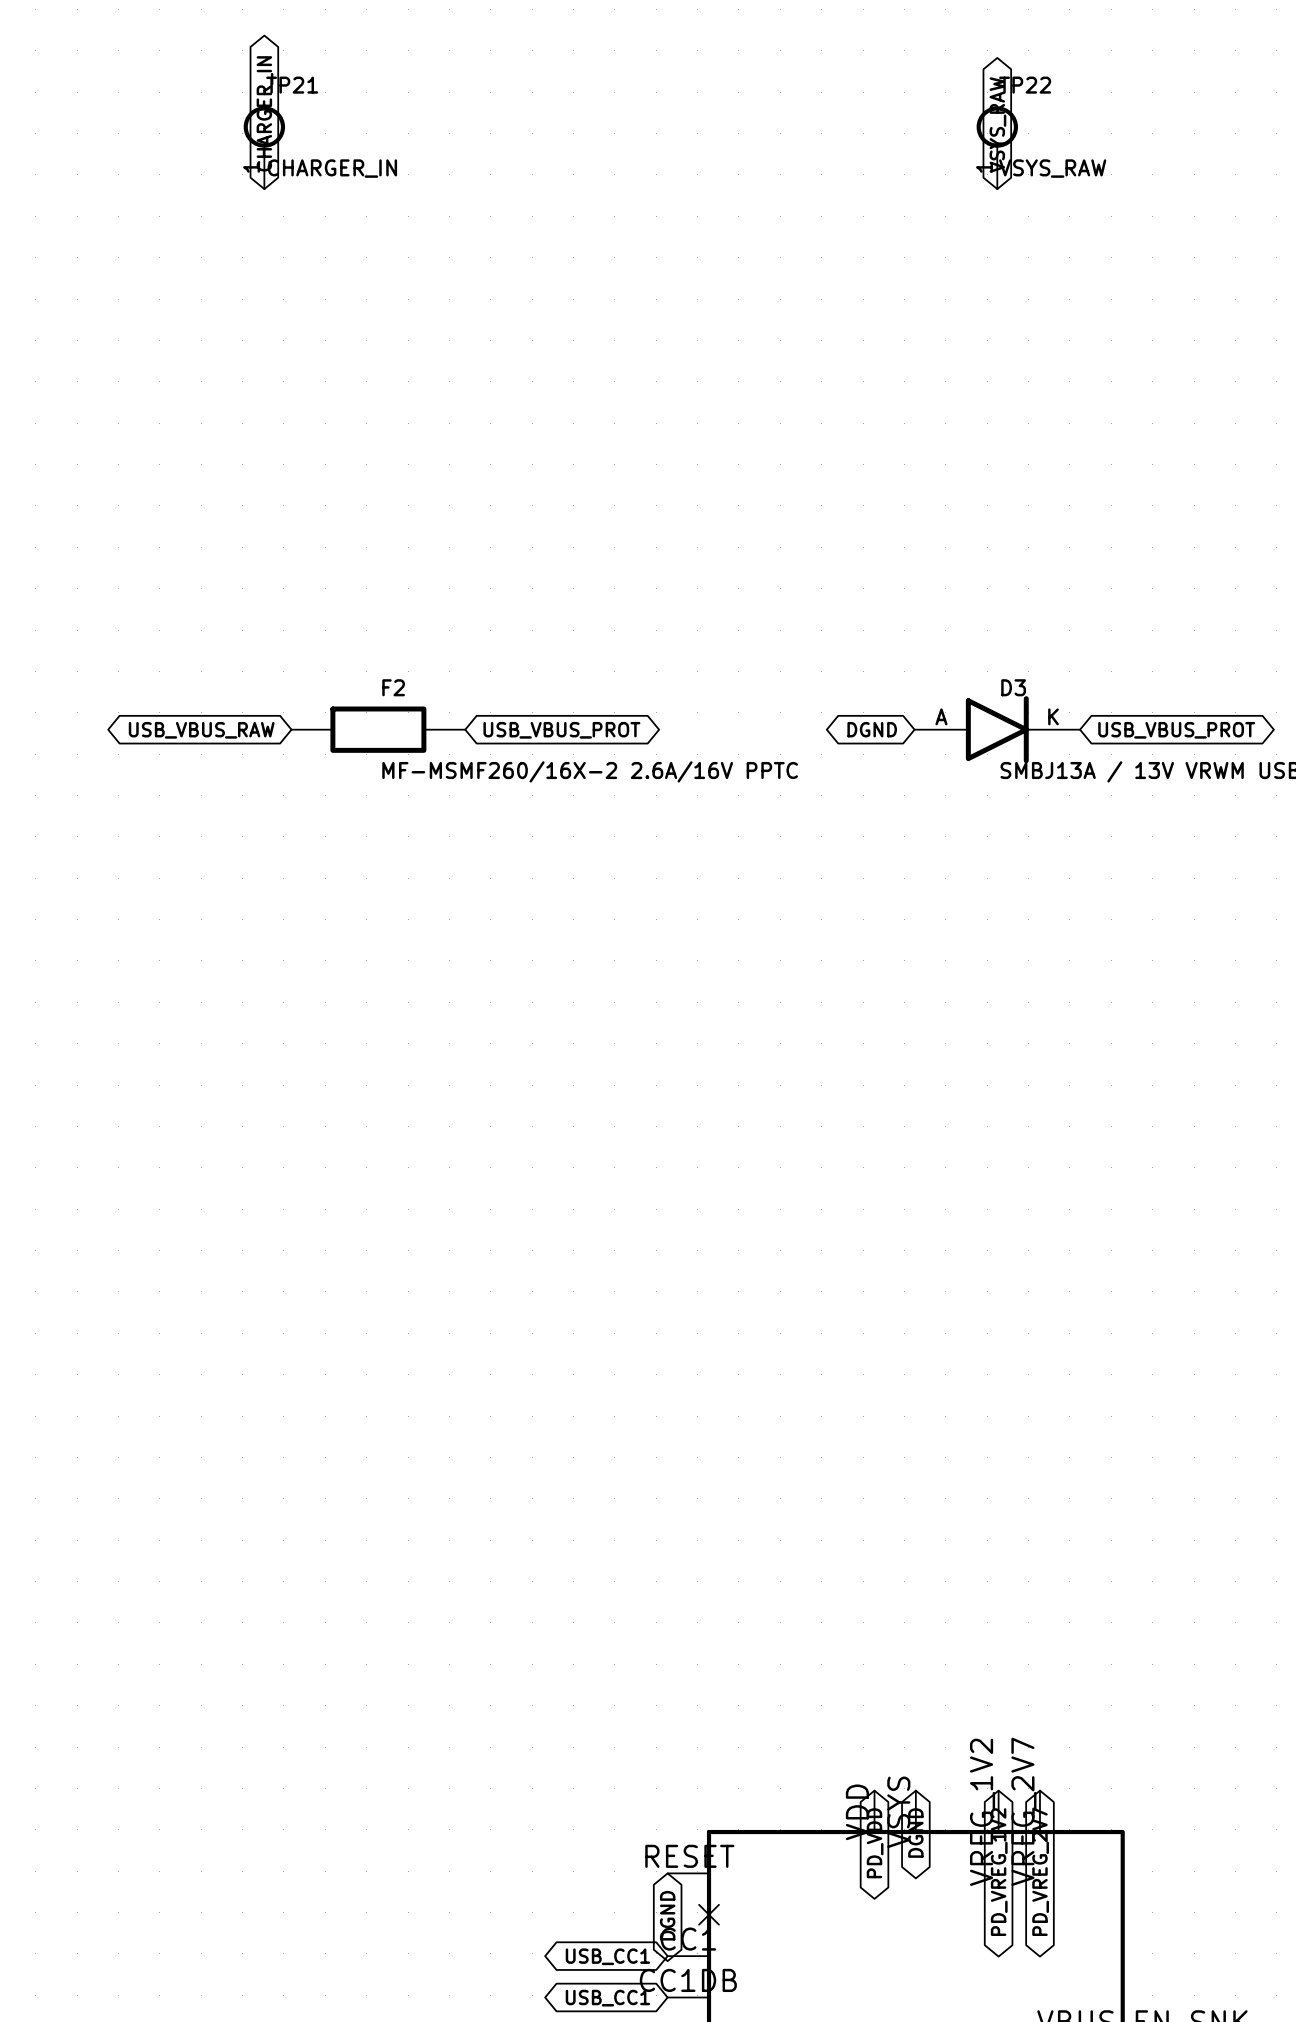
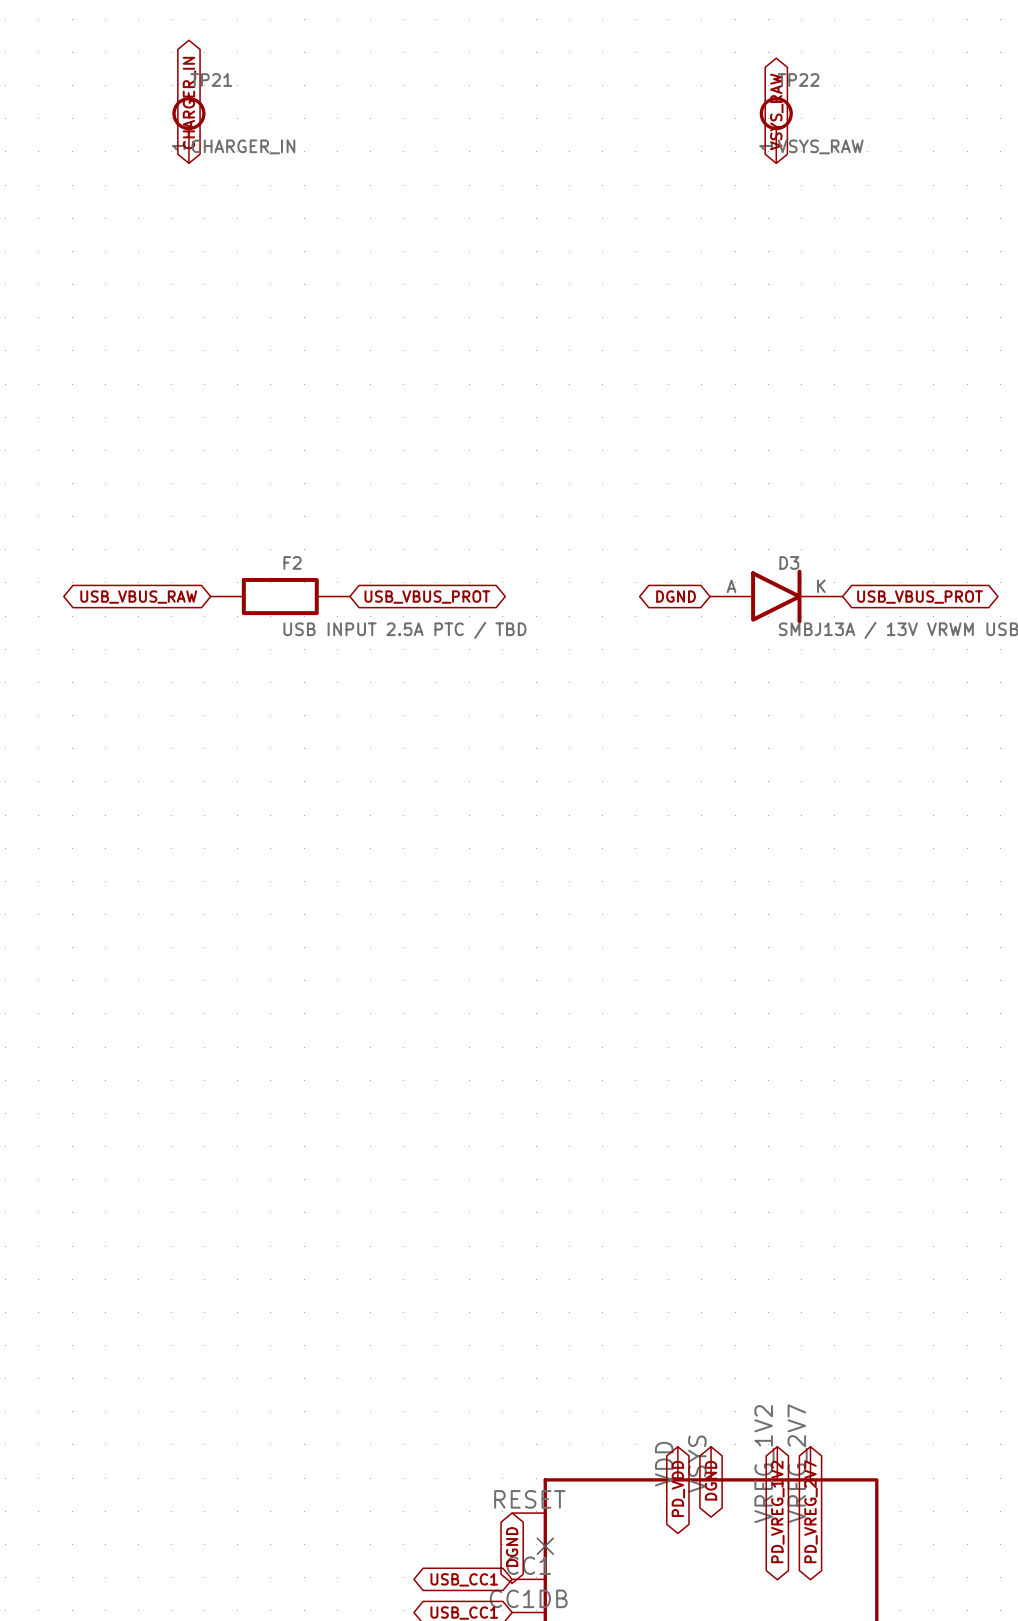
F2 value: MF-MSMF260/16X-2 2.6A/16V PPTC (590, 771) -> USB INPUT 2.5A PTC / TBD (404, 630)

